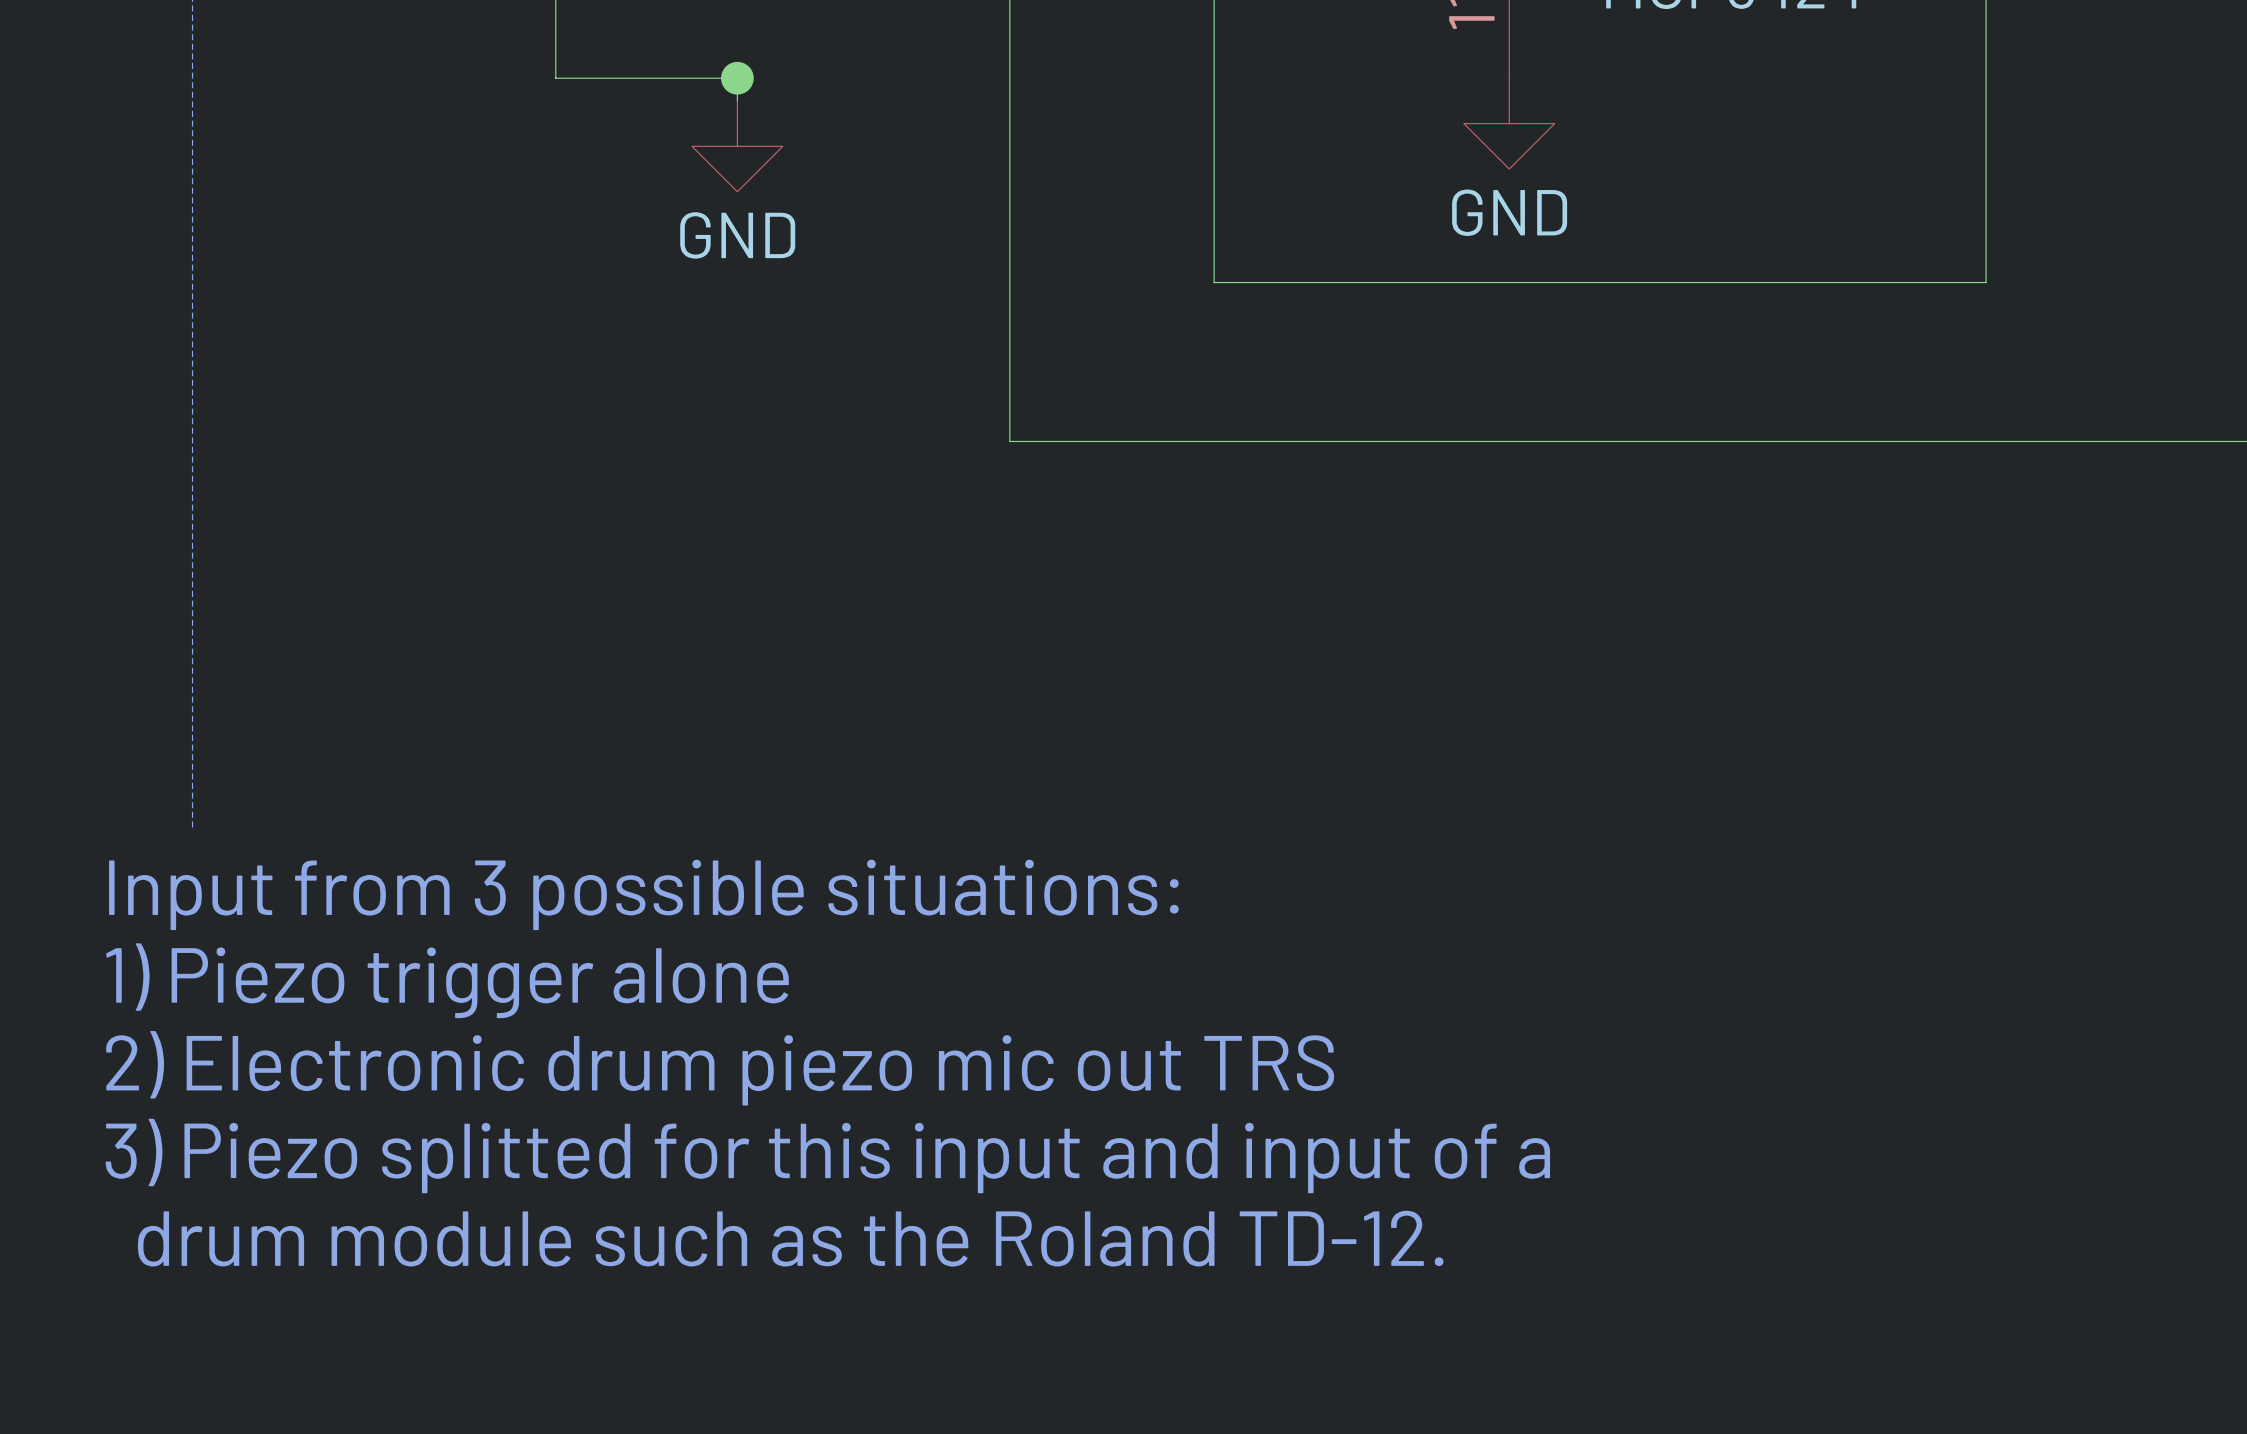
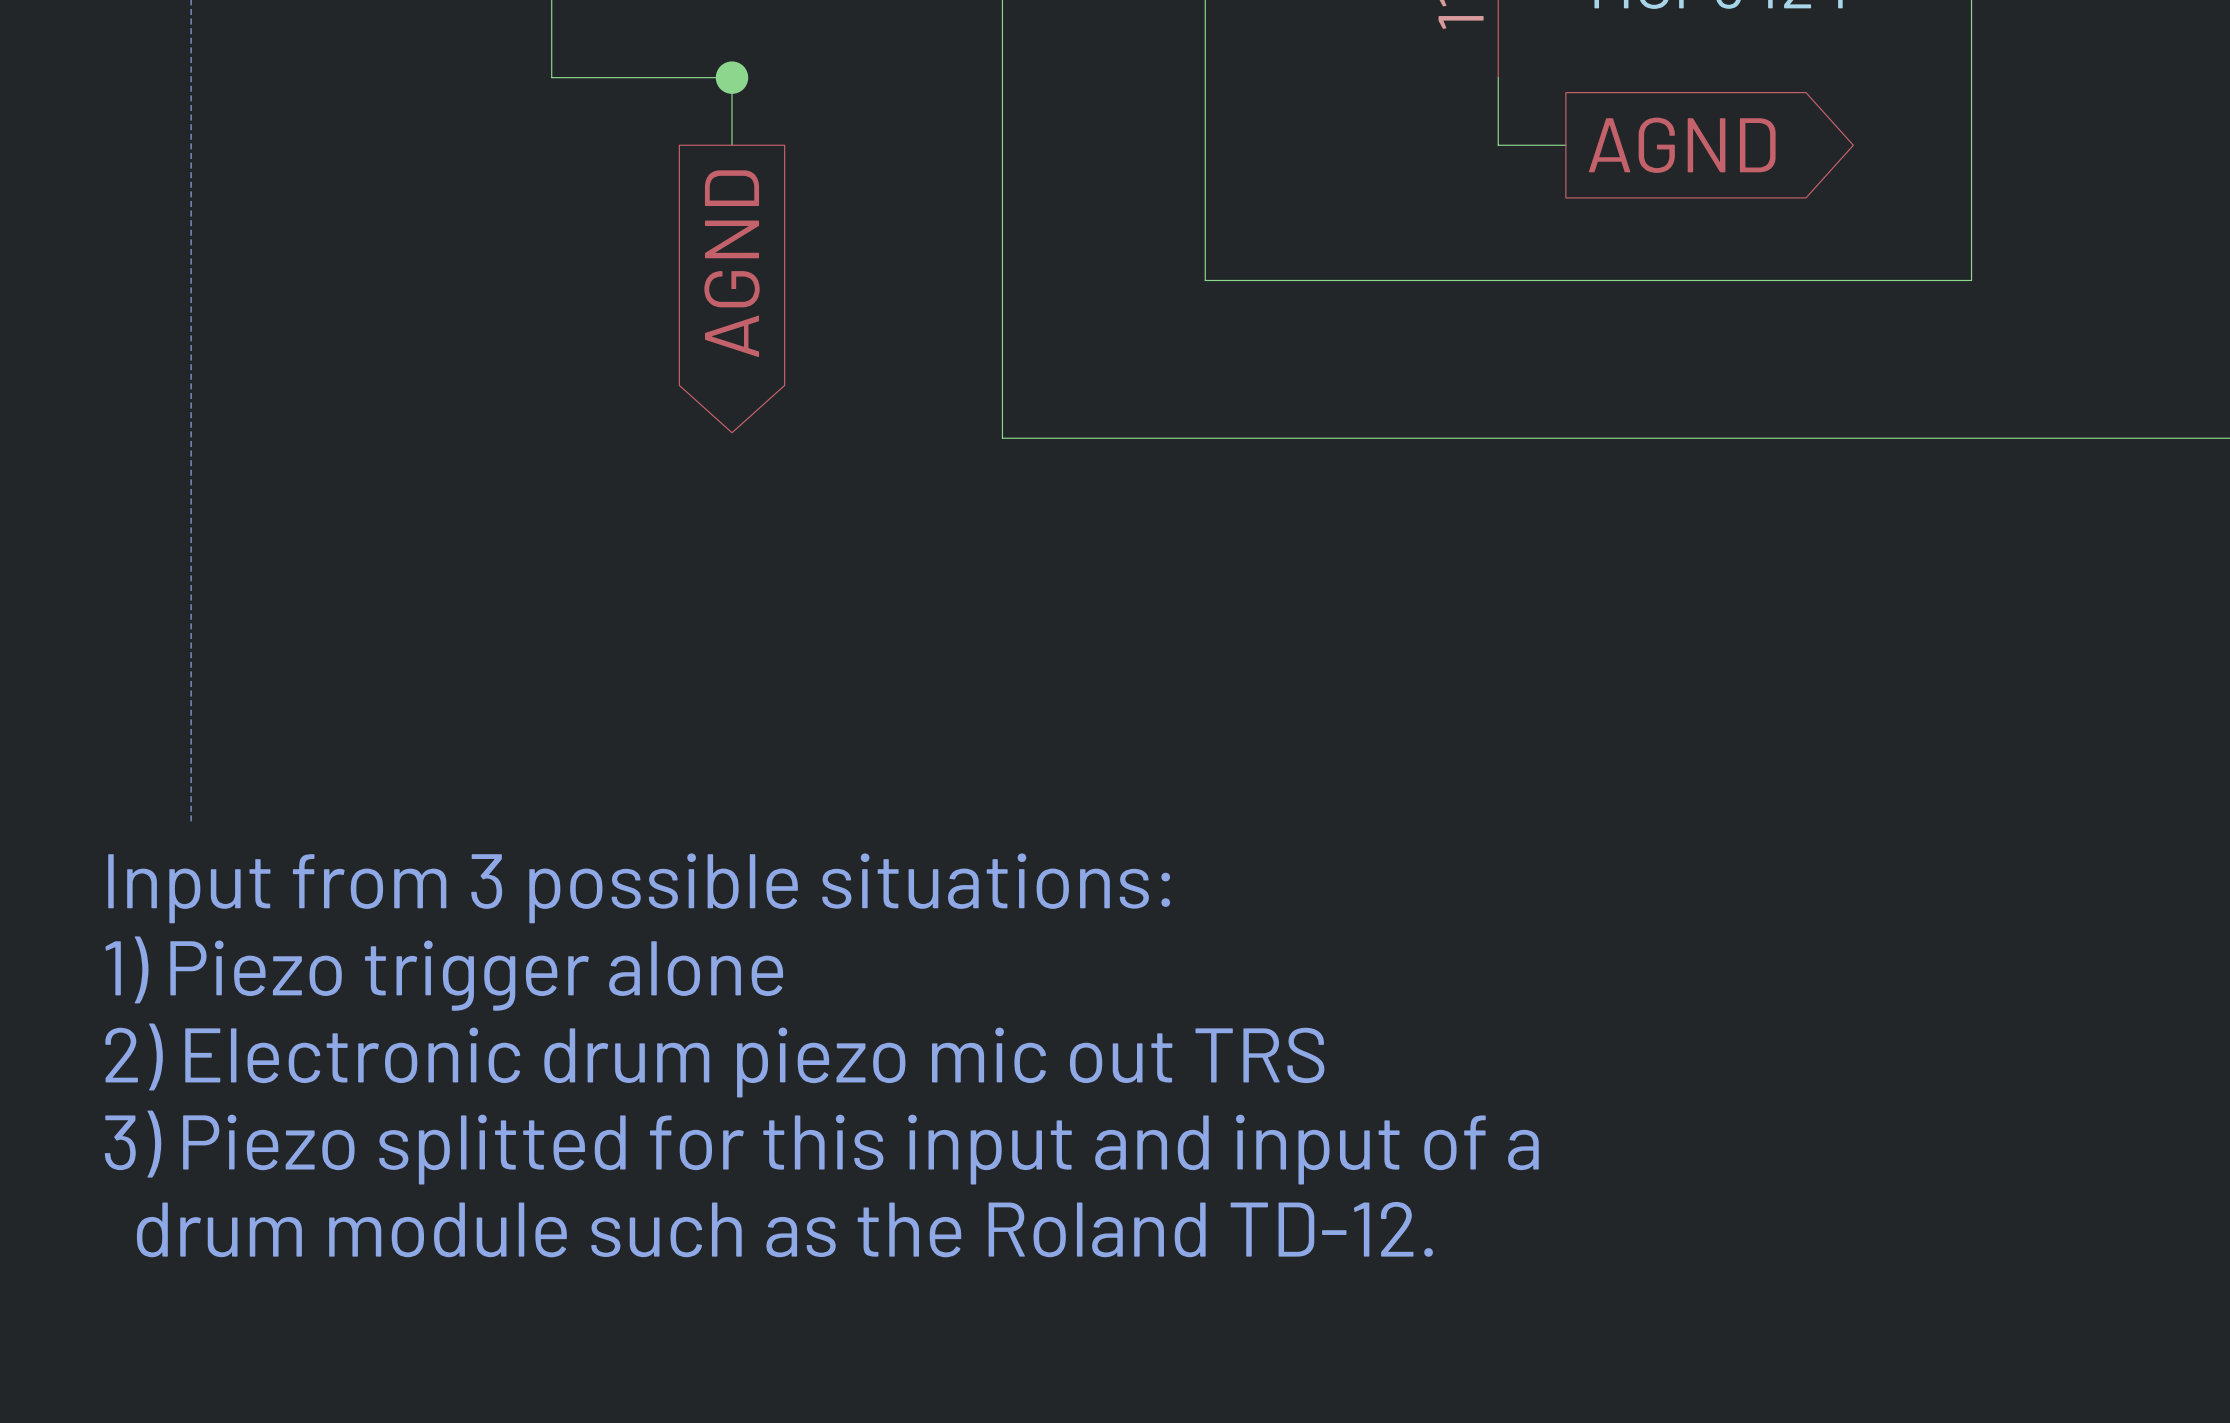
wire: none -> (1498, 77) (1498, 145) (1565, 145)
power symbol: GND (1509, 123) -> none
power symbol: GND (737, 146) -> none
global label: none -> AGND (1682, 145)
global label: none -> AGND (732, 263)

